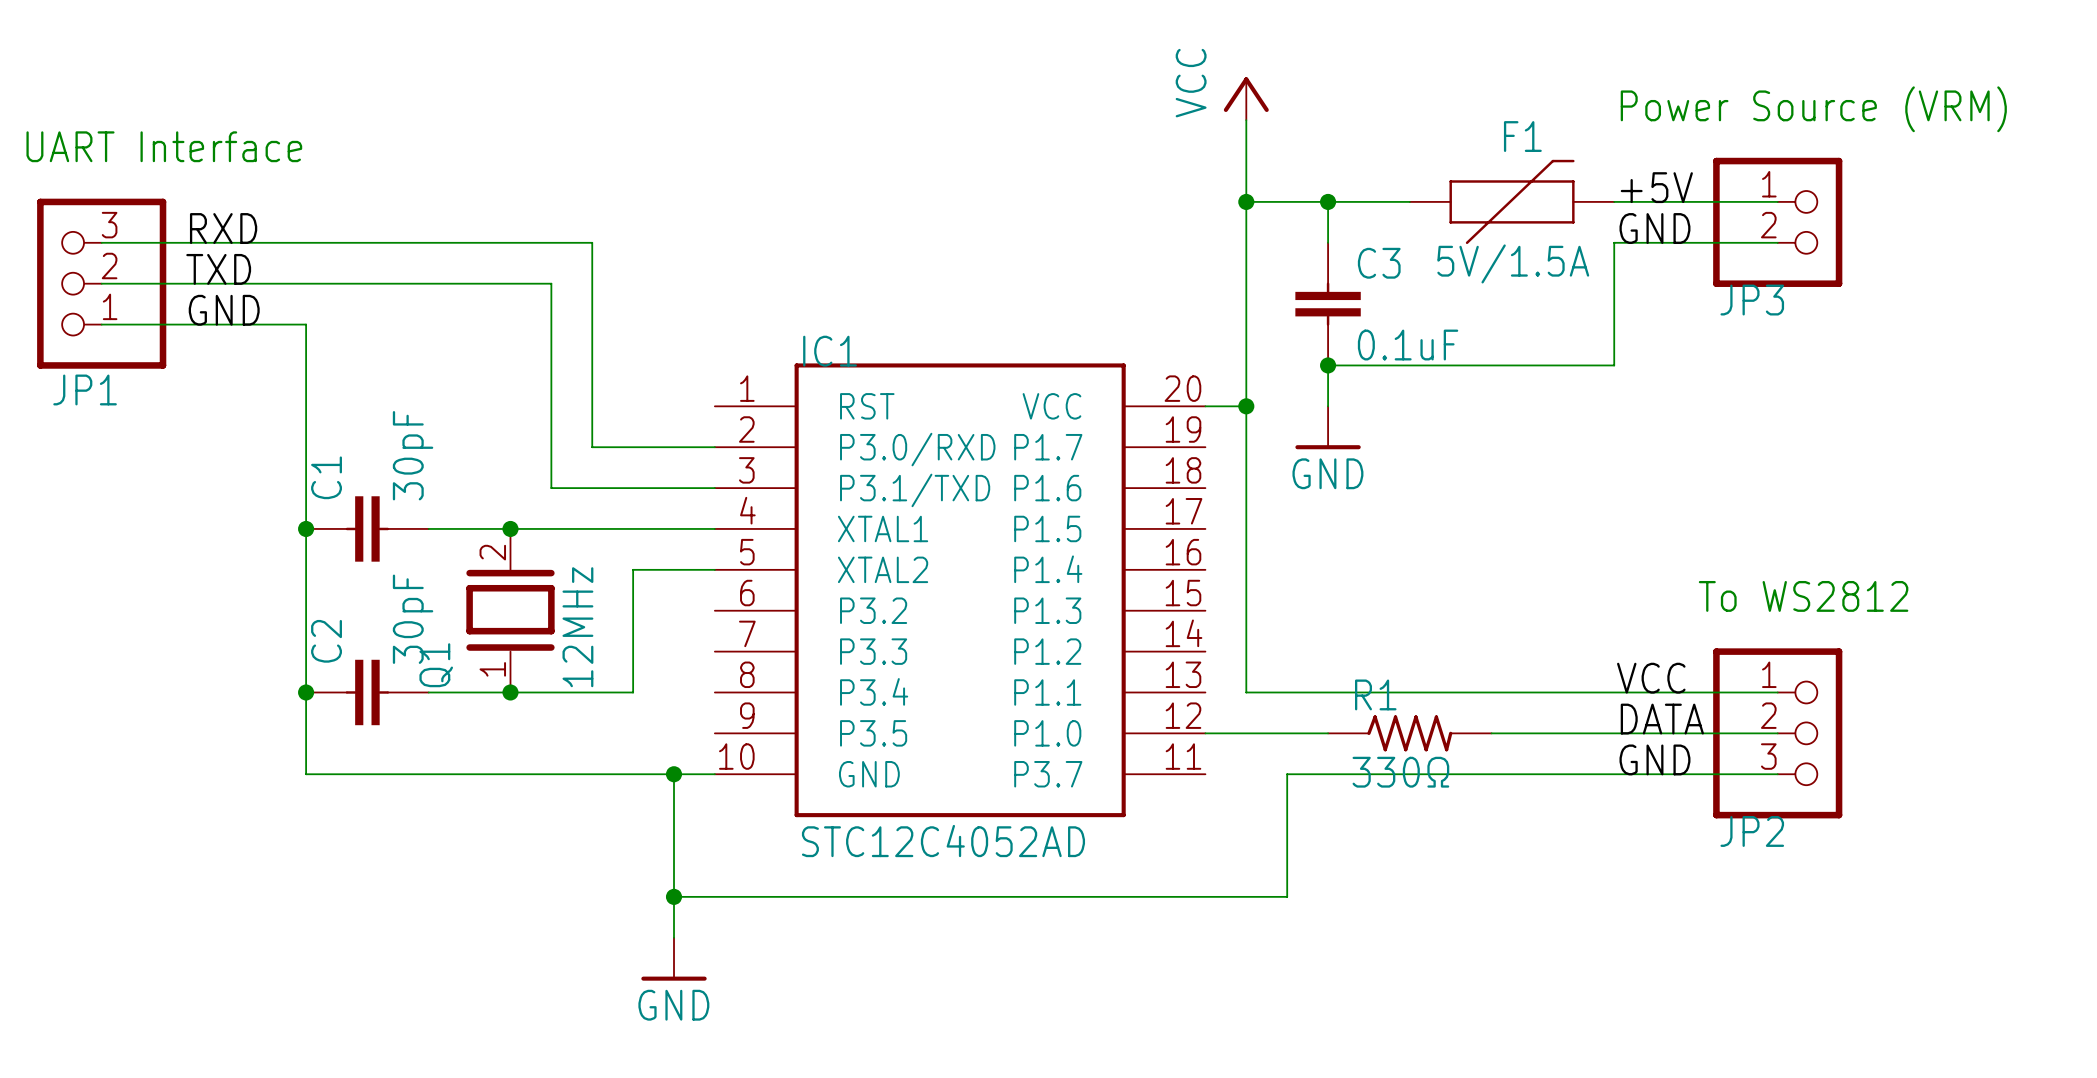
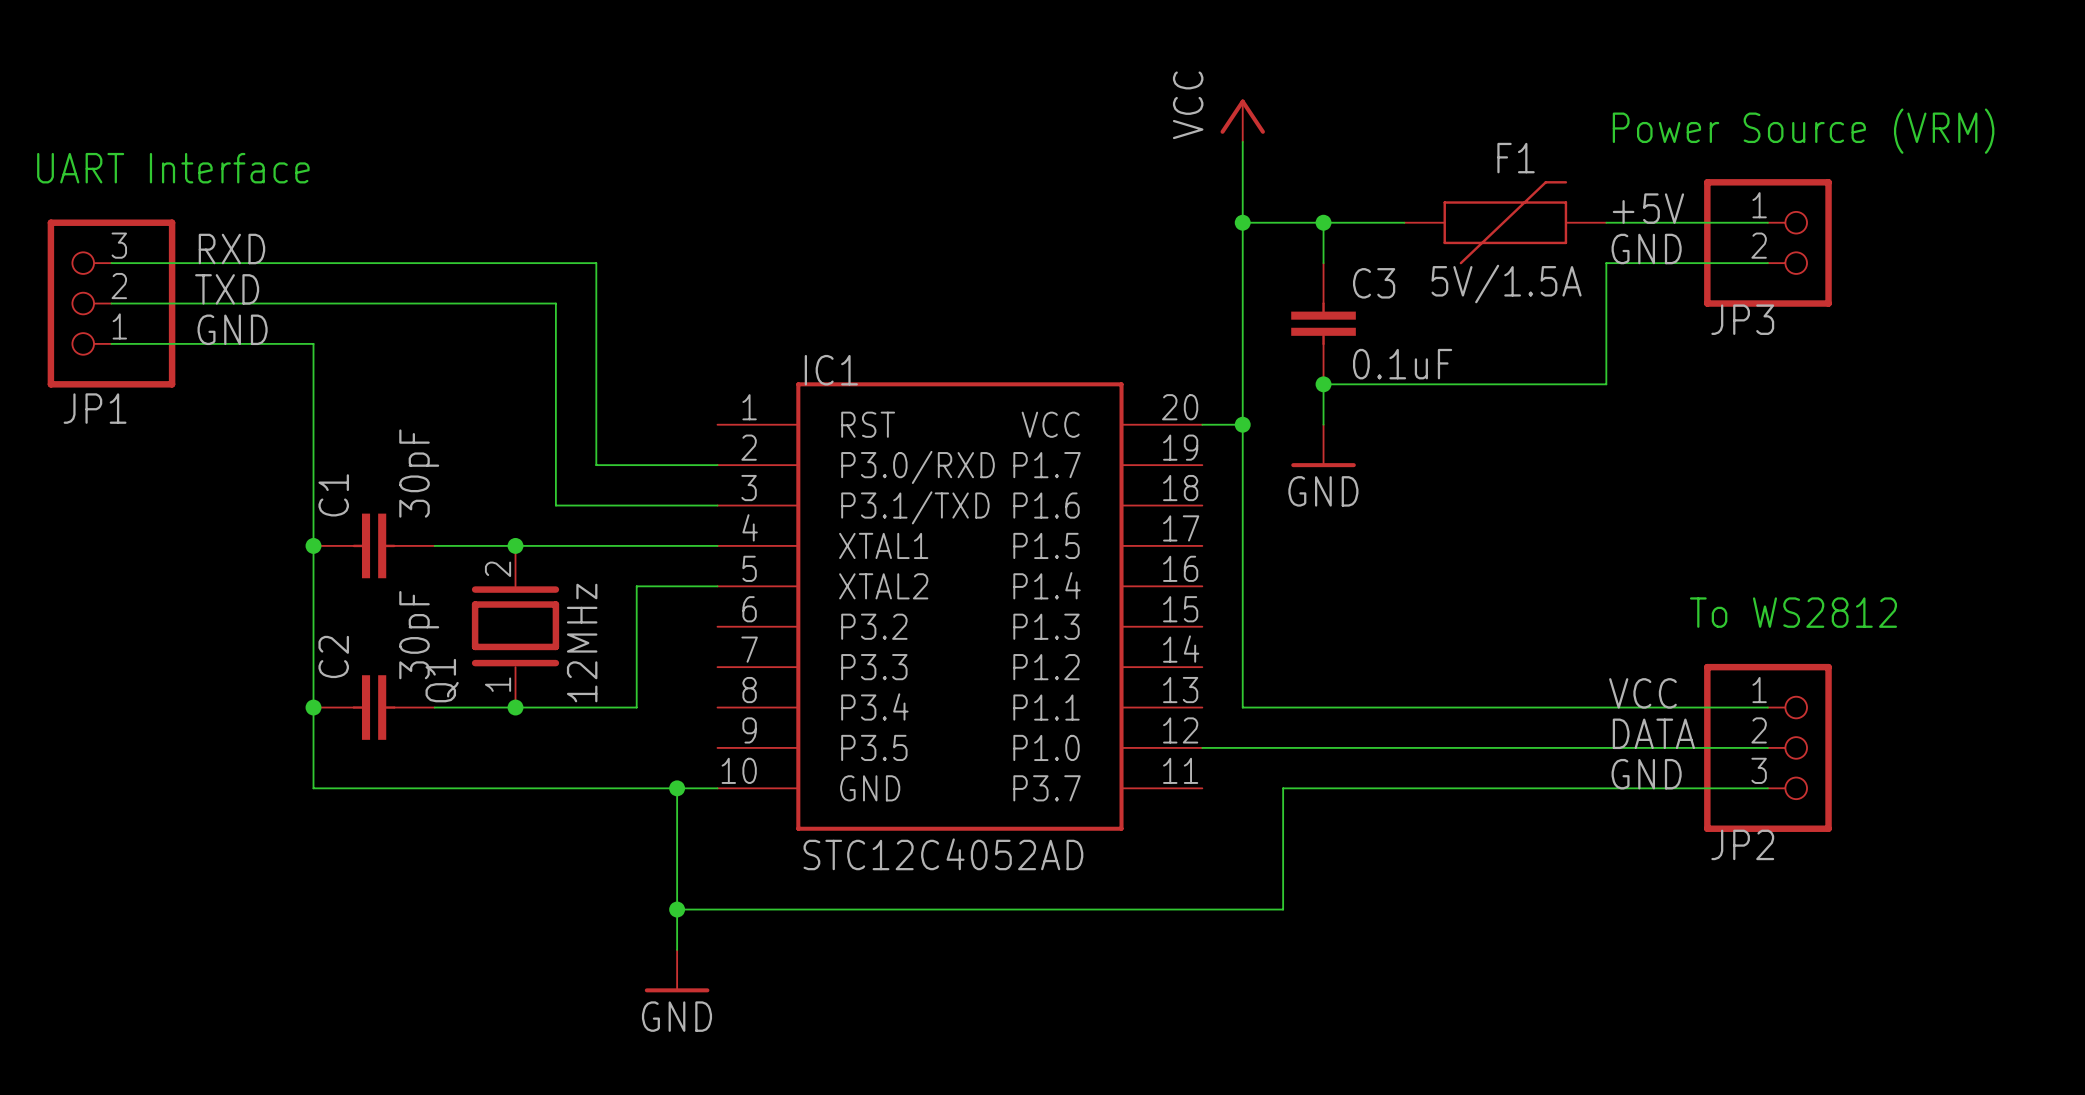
R1: 330Ω (1409, 733) -> none

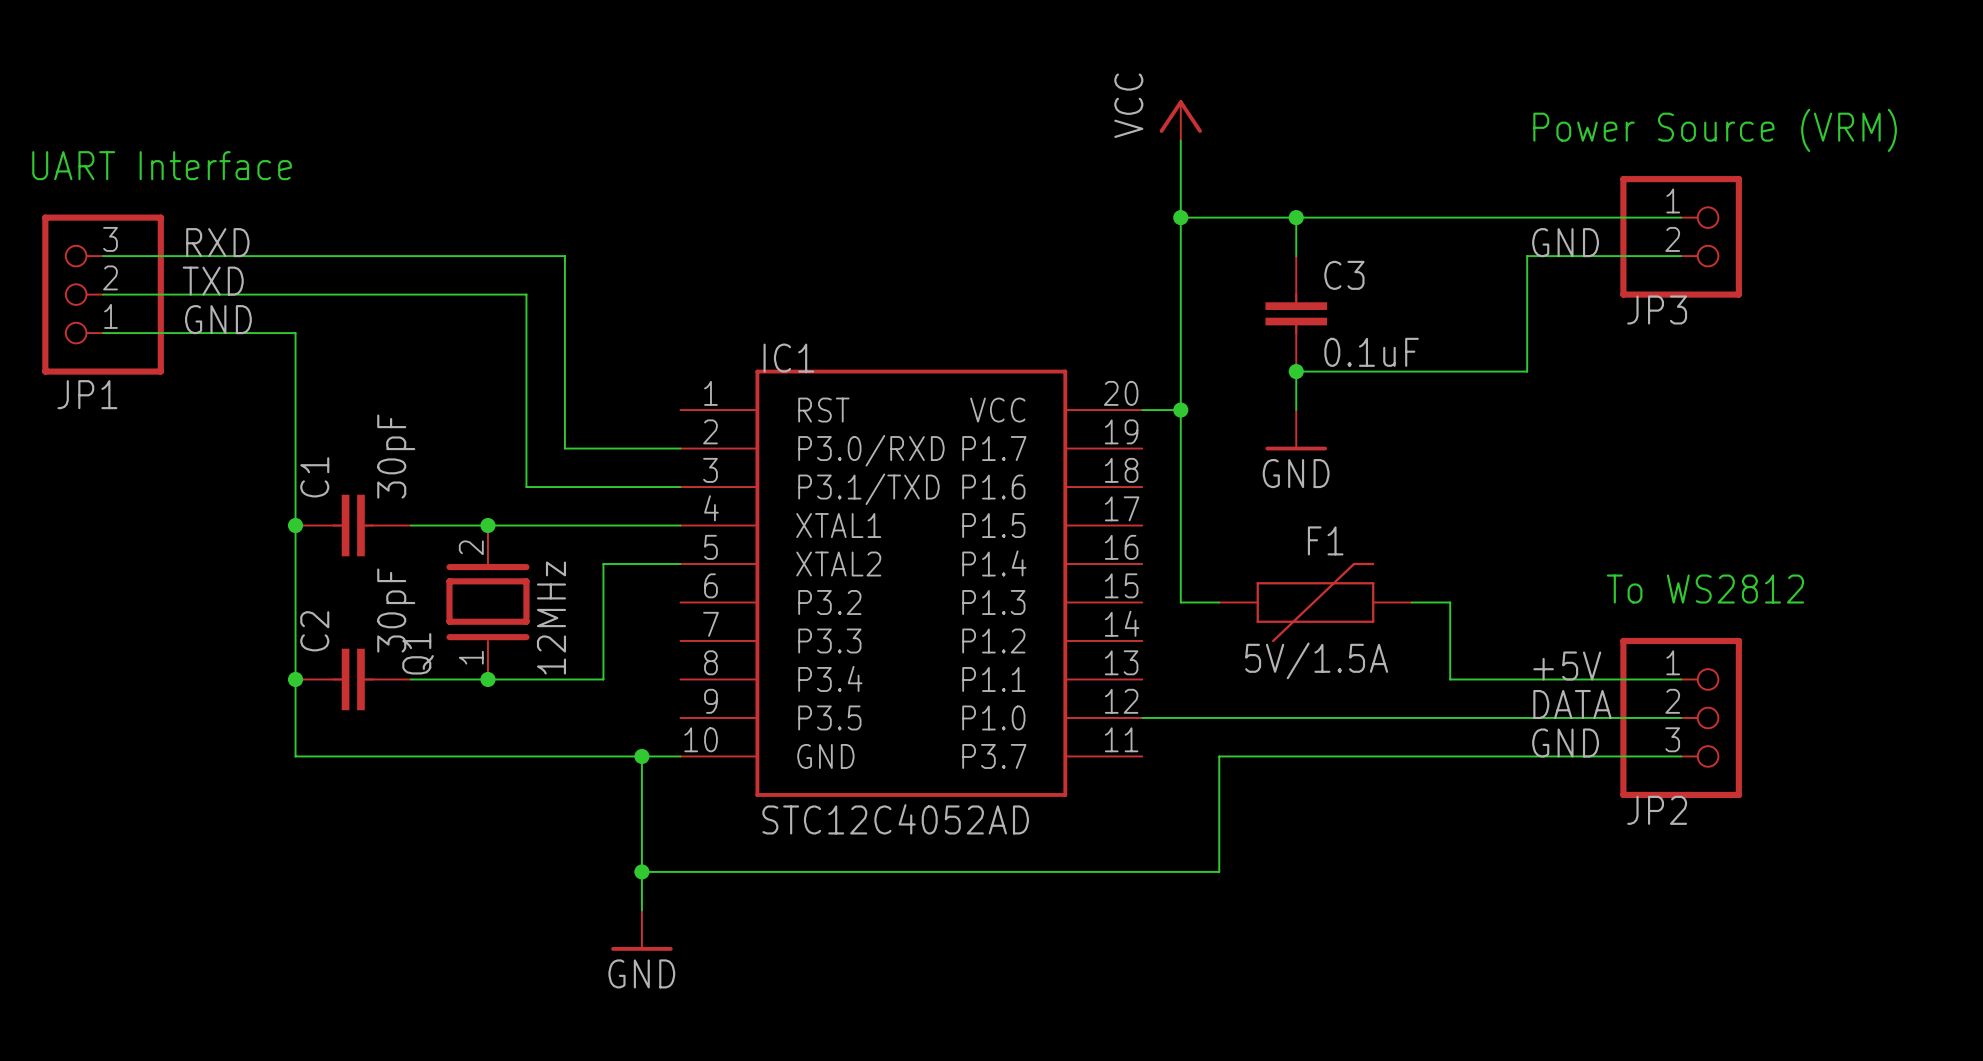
label: +5V (1648, 208) -> none
wire: (1323, 222) (1323, 263) -> (1296, 217) (1296, 256)
junction position: (1323, 222) -> (1296, 217)
wire: none -> (1334, 217) (1527, 217)
F1 position: (1505, 222) -> (1315, 602)
C3 position: (1323, 323) -> (1296, 313)
junction position: (1323, 384) -> (1296, 371)
wire: (1363, 384) (1323, 384) (1323, 424) -> (1296, 371) (1296, 410)
power symbol position: GND (1323, 445) -> GND (1296, 430)
wire: (1242, 626) (1242, 707) (1525, 707) -> (1411, 602) (1450, 602) (1450, 679)
wire: none -> (1180, 602) (1219, 602)
label: VCC (1642, 693) -> +5V (1567, 666)

